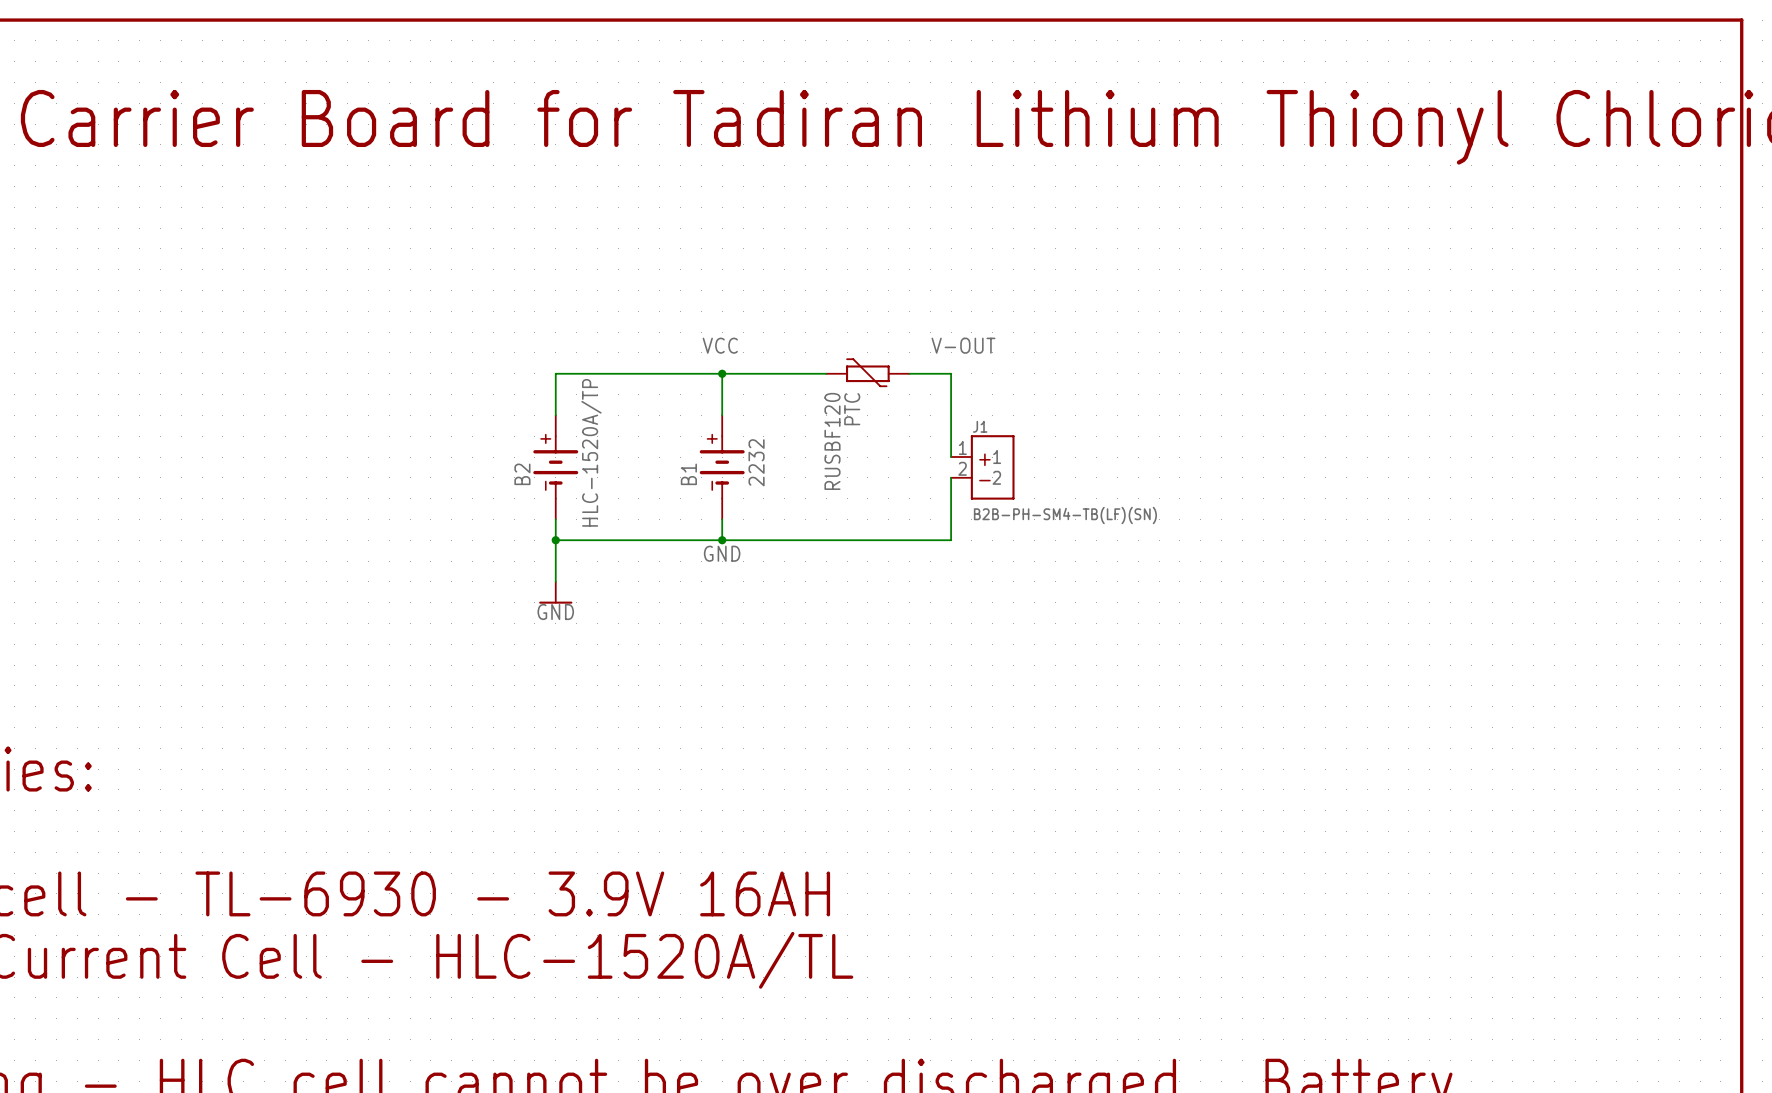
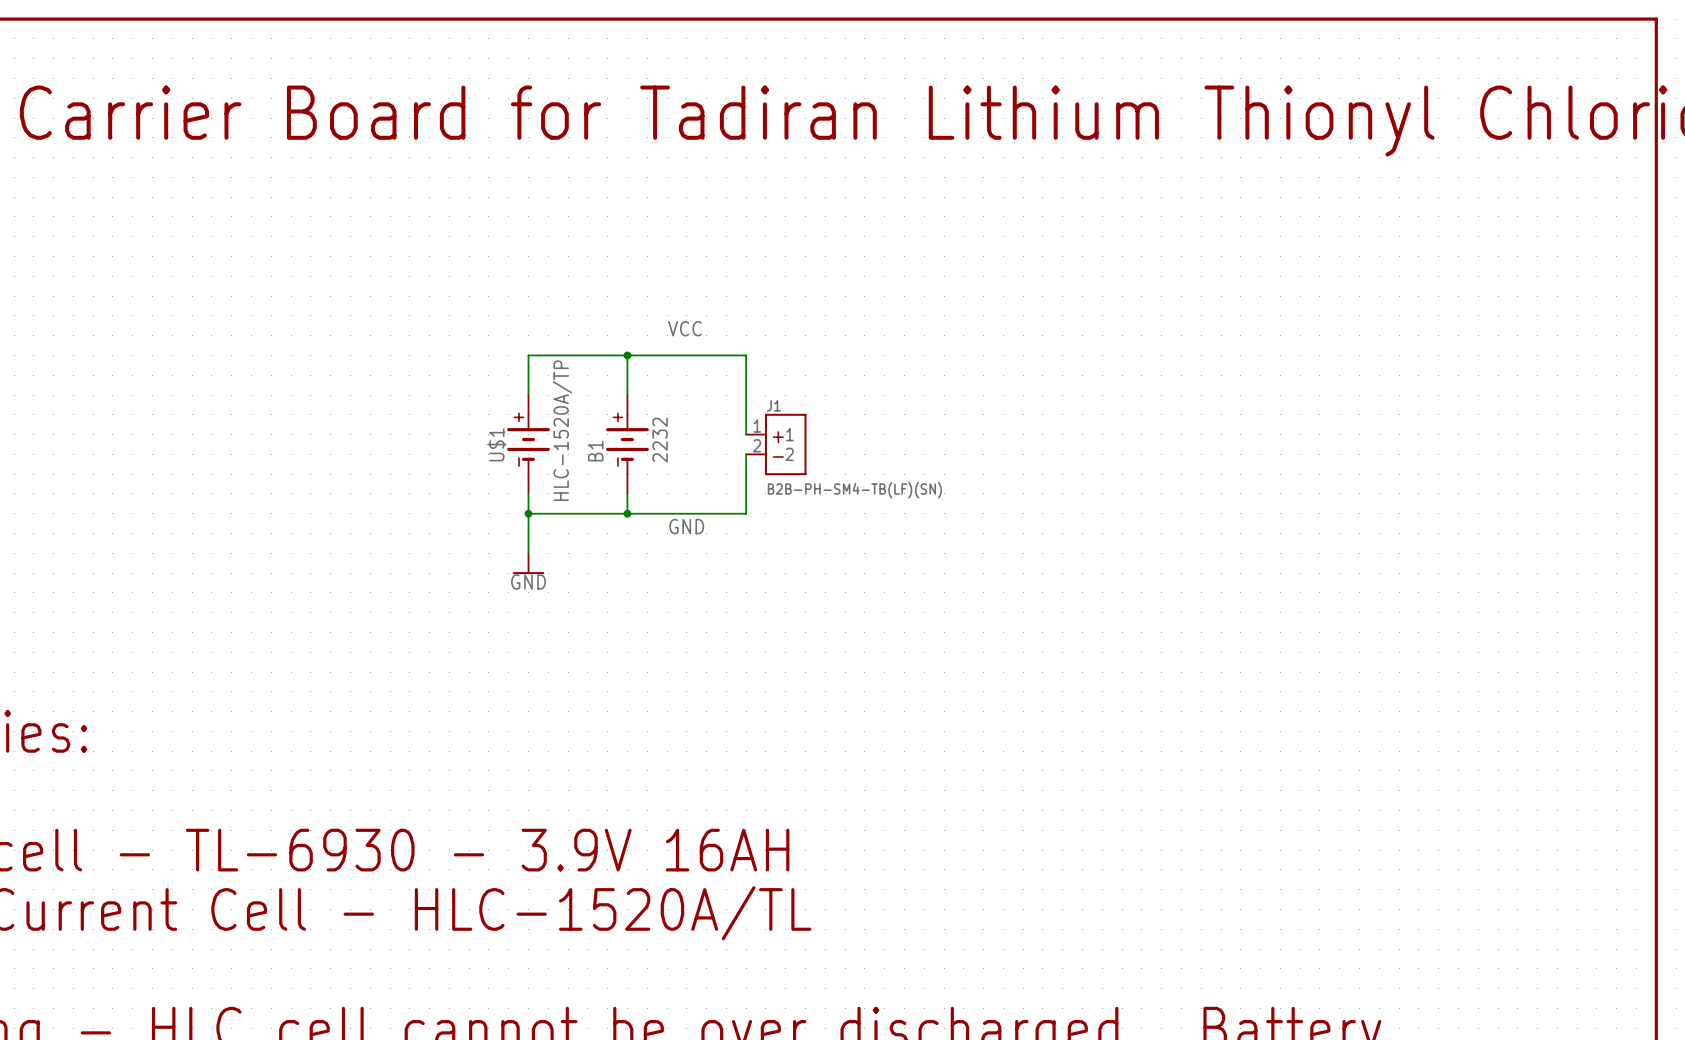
label: V-OUT (963, 345) -> none
PTC: RUSBF120 (867, 372) -> none
junction: none -> (627, 355)
wire: (722, 373) (722, 415) -> (627, 355) (627, 395)
junction: (722, 373) -> none
wire: (784, 373) (826, 373) -> (746, 355) (746, 434)
wire: (909, 373) (951, 373) (951, 457) -> none
B1 position: (722, 467) -> (627, 444)
J1 position: (982, 467) -> (776, 444)
B2 name: B2 (522, 474) -> U$1 (496, 444)
wire: (951, 477) (951, 540) (784, 540) -> (746, 454) (746, 513)
wire: (722, 519) (722, 540) -> (627, 493) (627, 513)
junction: none -> (627, 513)
junction: (722, 540) -> none

